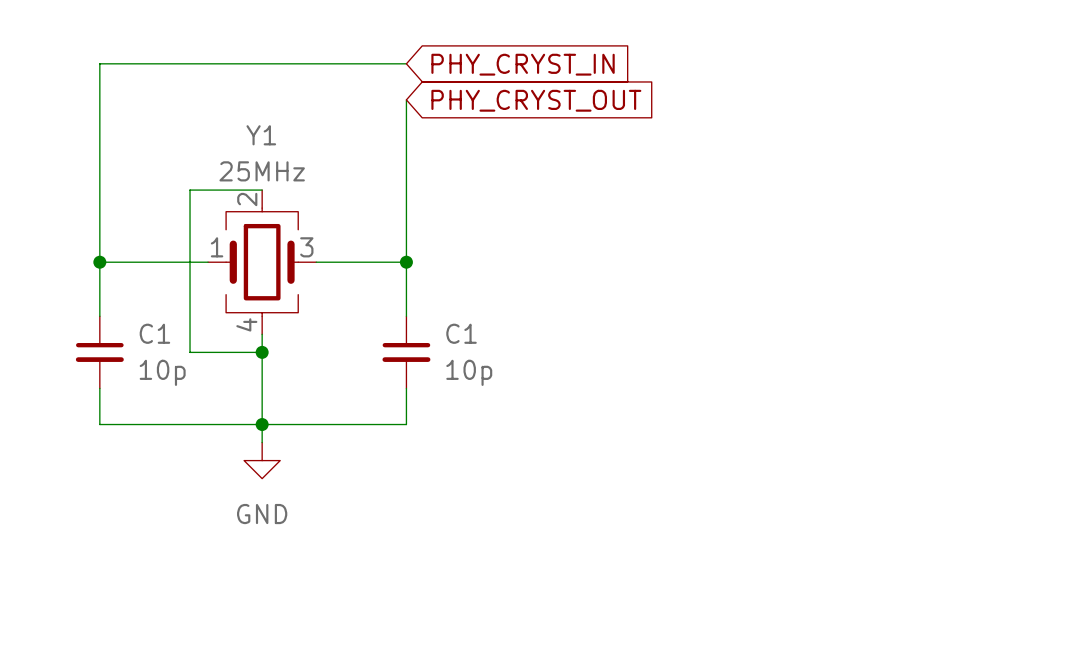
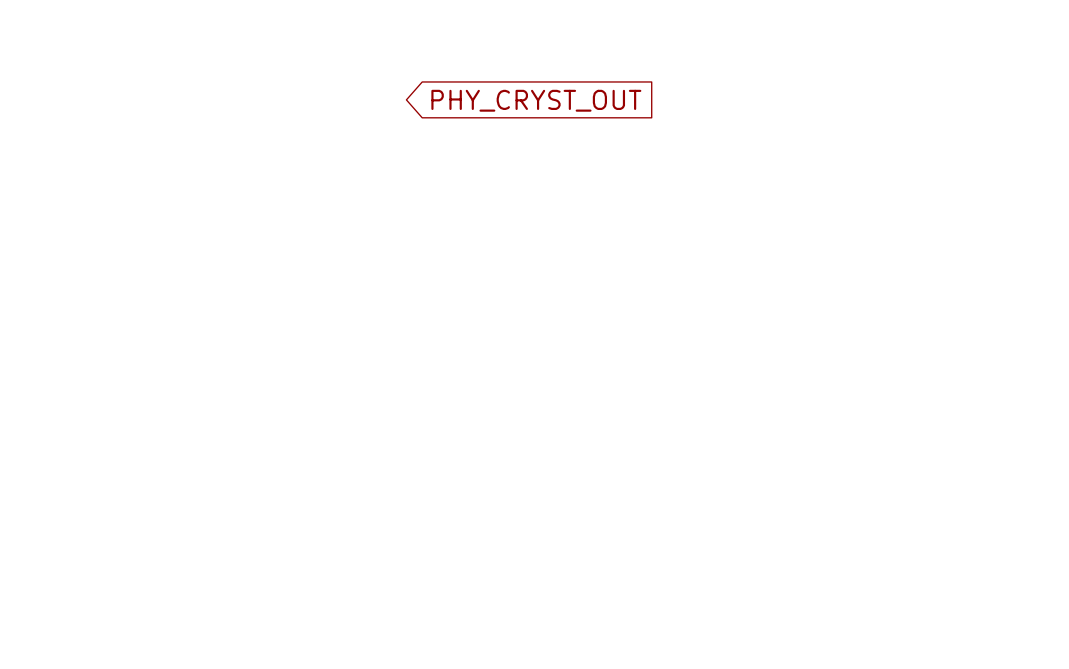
wire: (406, 63) (99, 63) (99, 316) -> none
global label: PHY_CRYST_IN (523, 64) -> none
wire: (406, 99) (406, 316) -> none
wire: (262, 190) (190, 190) (190, 352) (262, 352) -> none
wire: (99, 262) (208, 262) -> none
junction: (99, 262) -> none
Y1: 25MHz (262, 262) -> none
wire: (316, 262) (406, 262) -> none
junction: (406, 262) -> none
wire: (262, 334) (262, 442) -> none
C1: 10p (99, 352) -> none
junction: (262, 352) -> none
C1: 10p (406, 352) -> none
wire: (99, 388) (99, 424) (406, 424) (406, 388) -> none
junction: (262, 424) -> none
power symbol: GND (262, 460) -> none

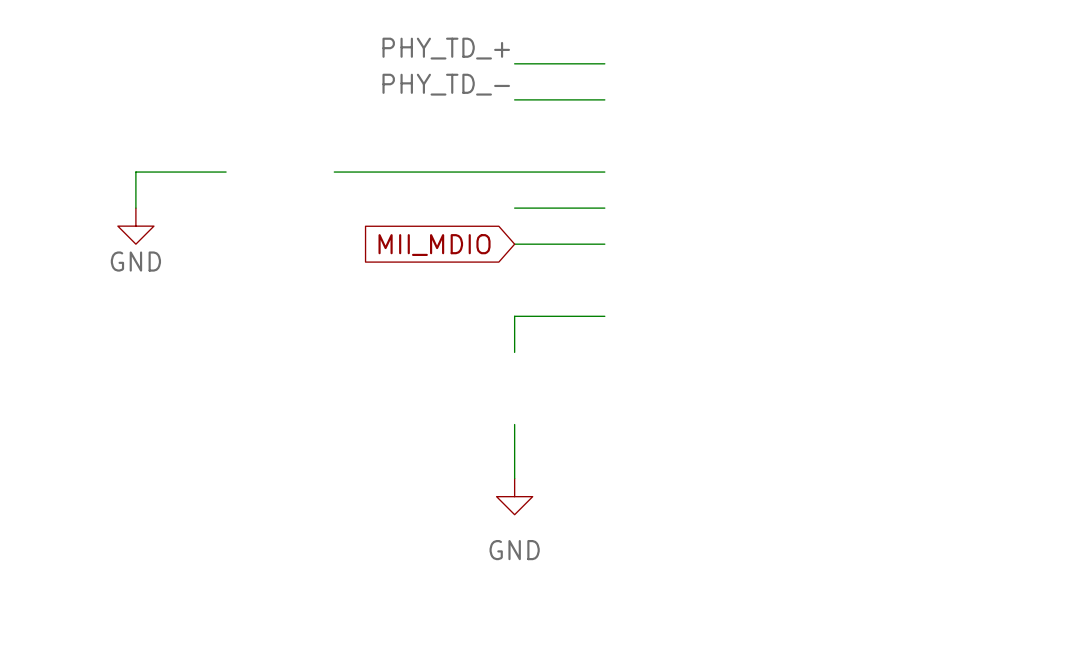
label: none -> PHY_TD_+ (446, 48)
wire: none -> (514, 63) (604, 63)
label: none -> PHY_TD_- (446, 84)
wire: none -> (514, 99) (604, 99)
global label: PHY_CRYST_OUT (536, 100) -> none
wire: none -> (226, 172) (135, 172) (135, 208)
wire: none -> (334, 172) (604, 172)
wire: none -> (514, 208) (604, 208)
power symbol: none -> GND (135, 226)
wire: none -> (514, 244) (604, 244)
global label: none -> MII_MDIO (434, 245)
wire: none -> (604, 316) (514, 316) (514, 352)
wire: none -> (514, 424) (514, 478)
power symbol: none -> GND (514, 496)

